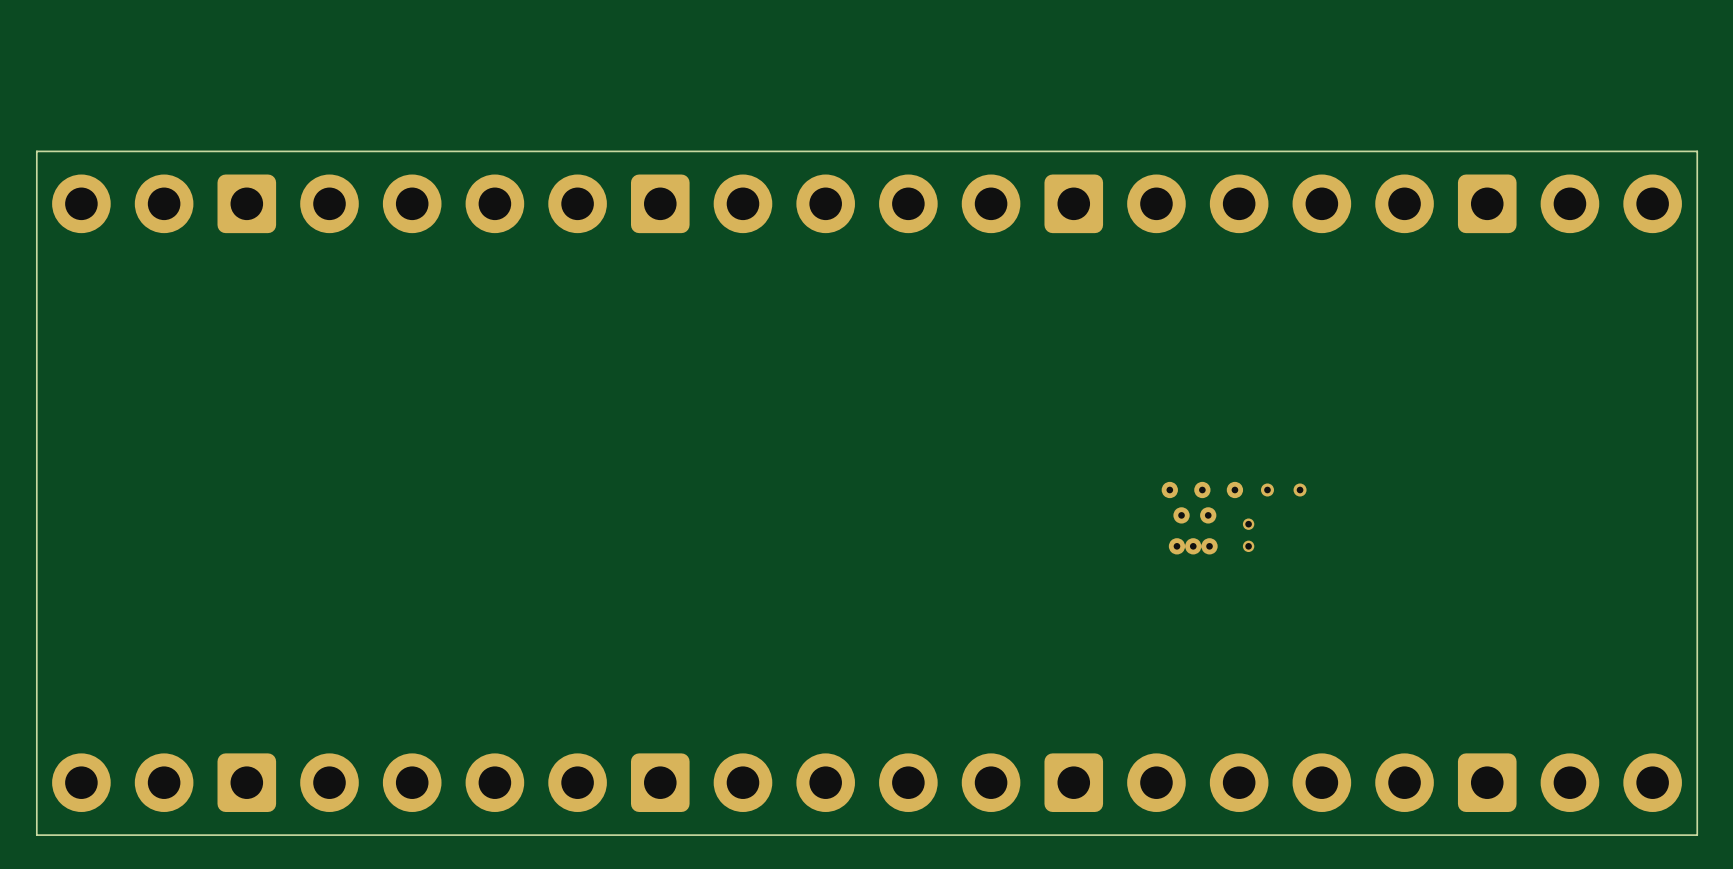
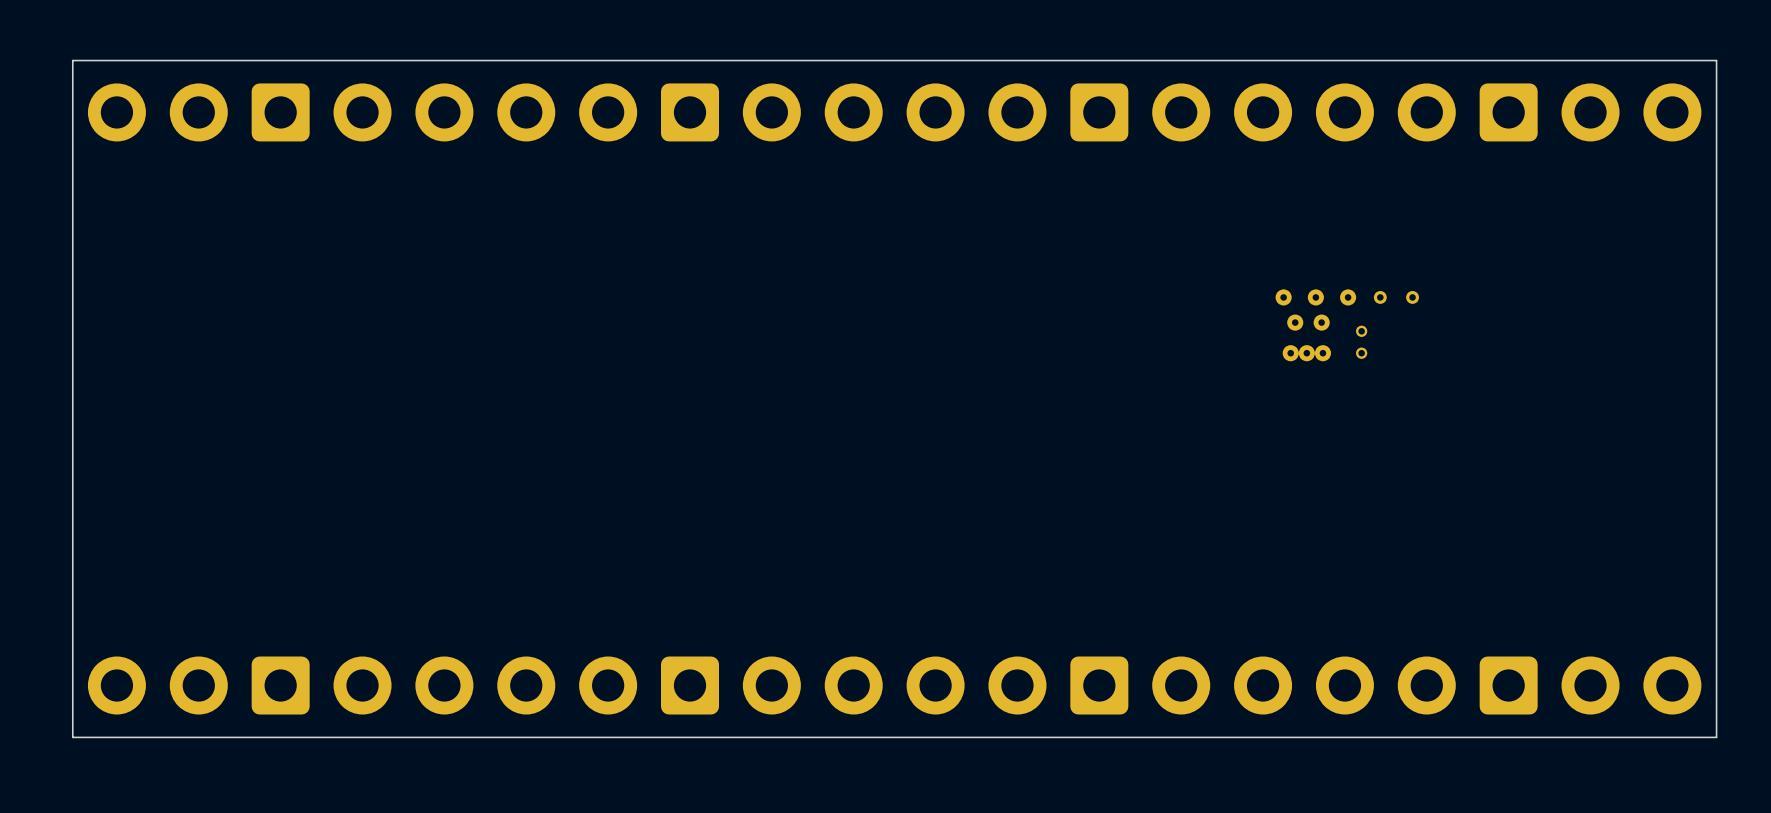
part position: (1234, 518) -> (1347, 325)

